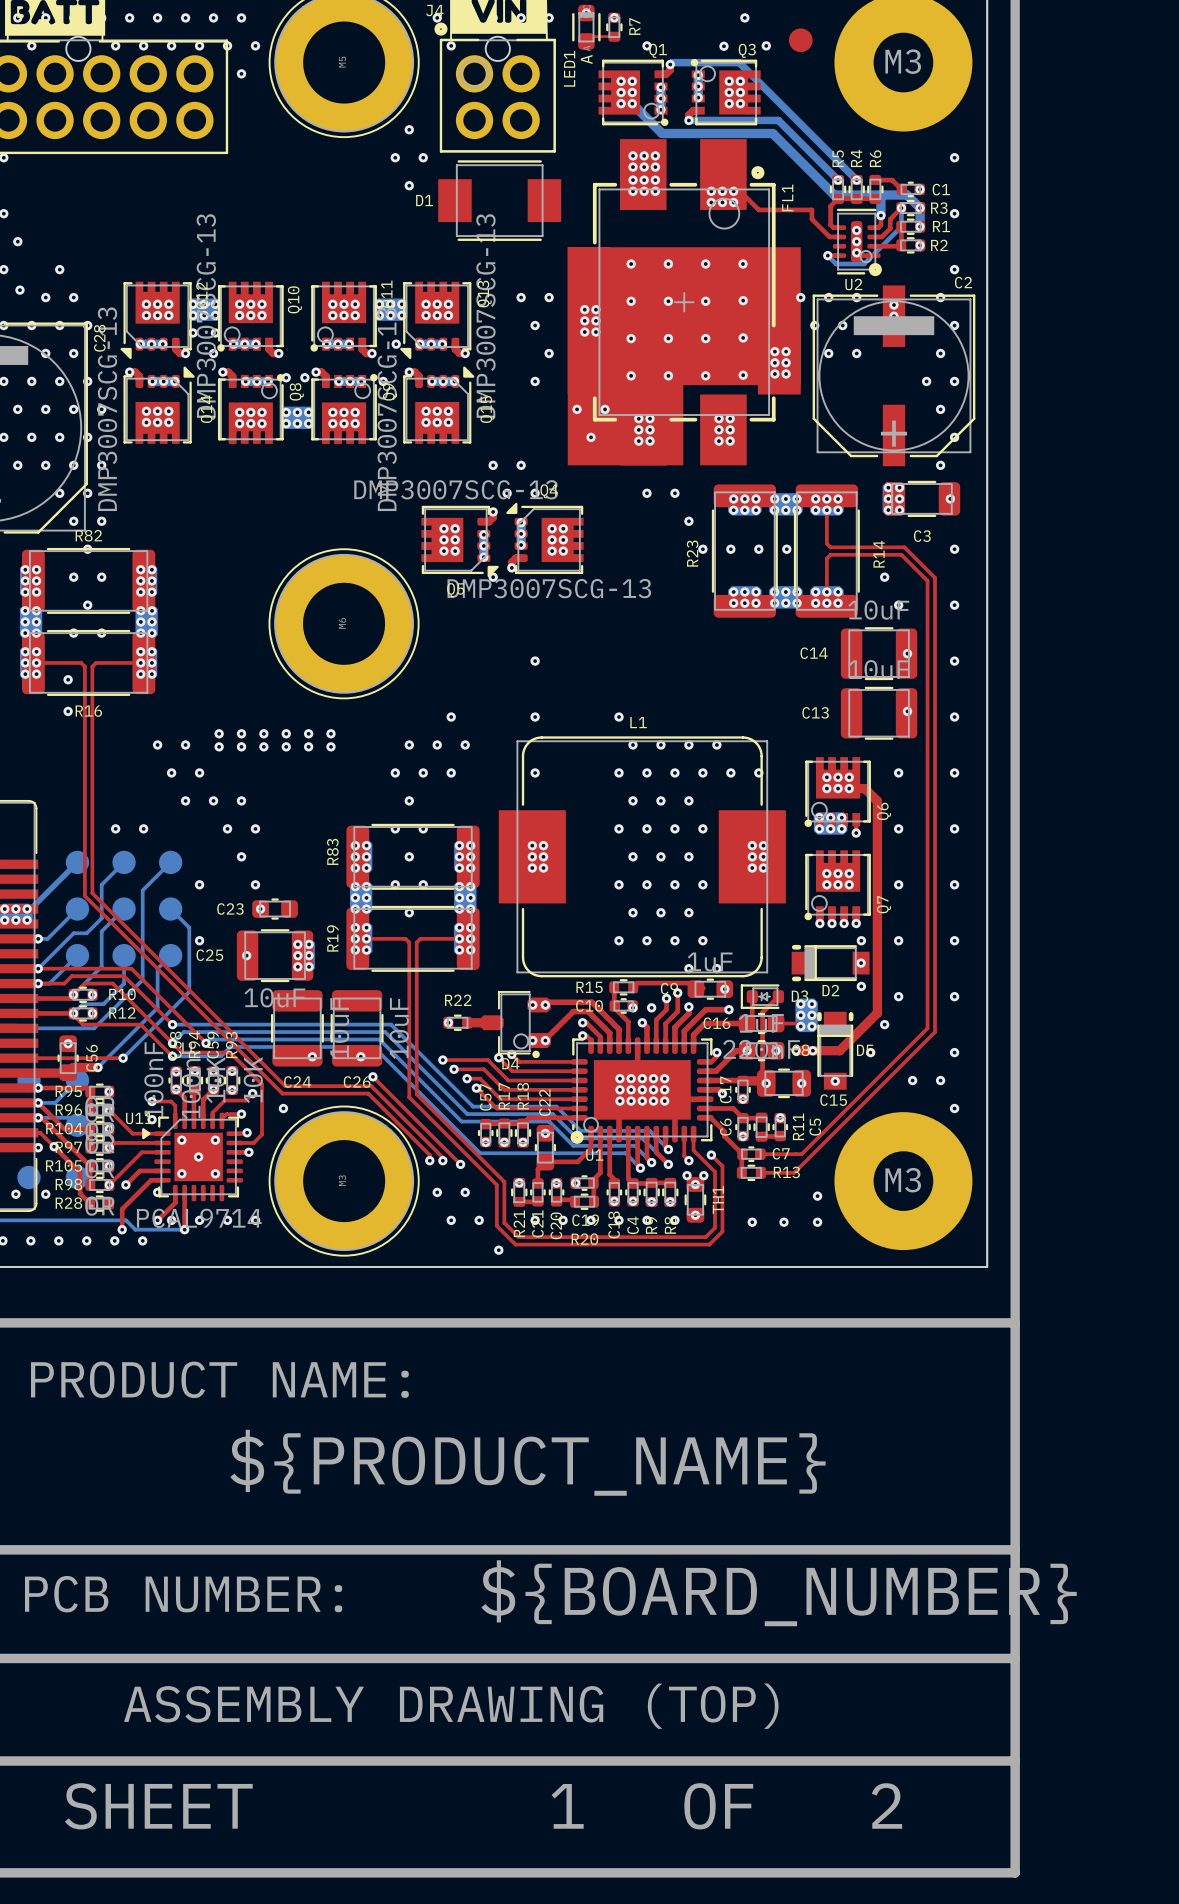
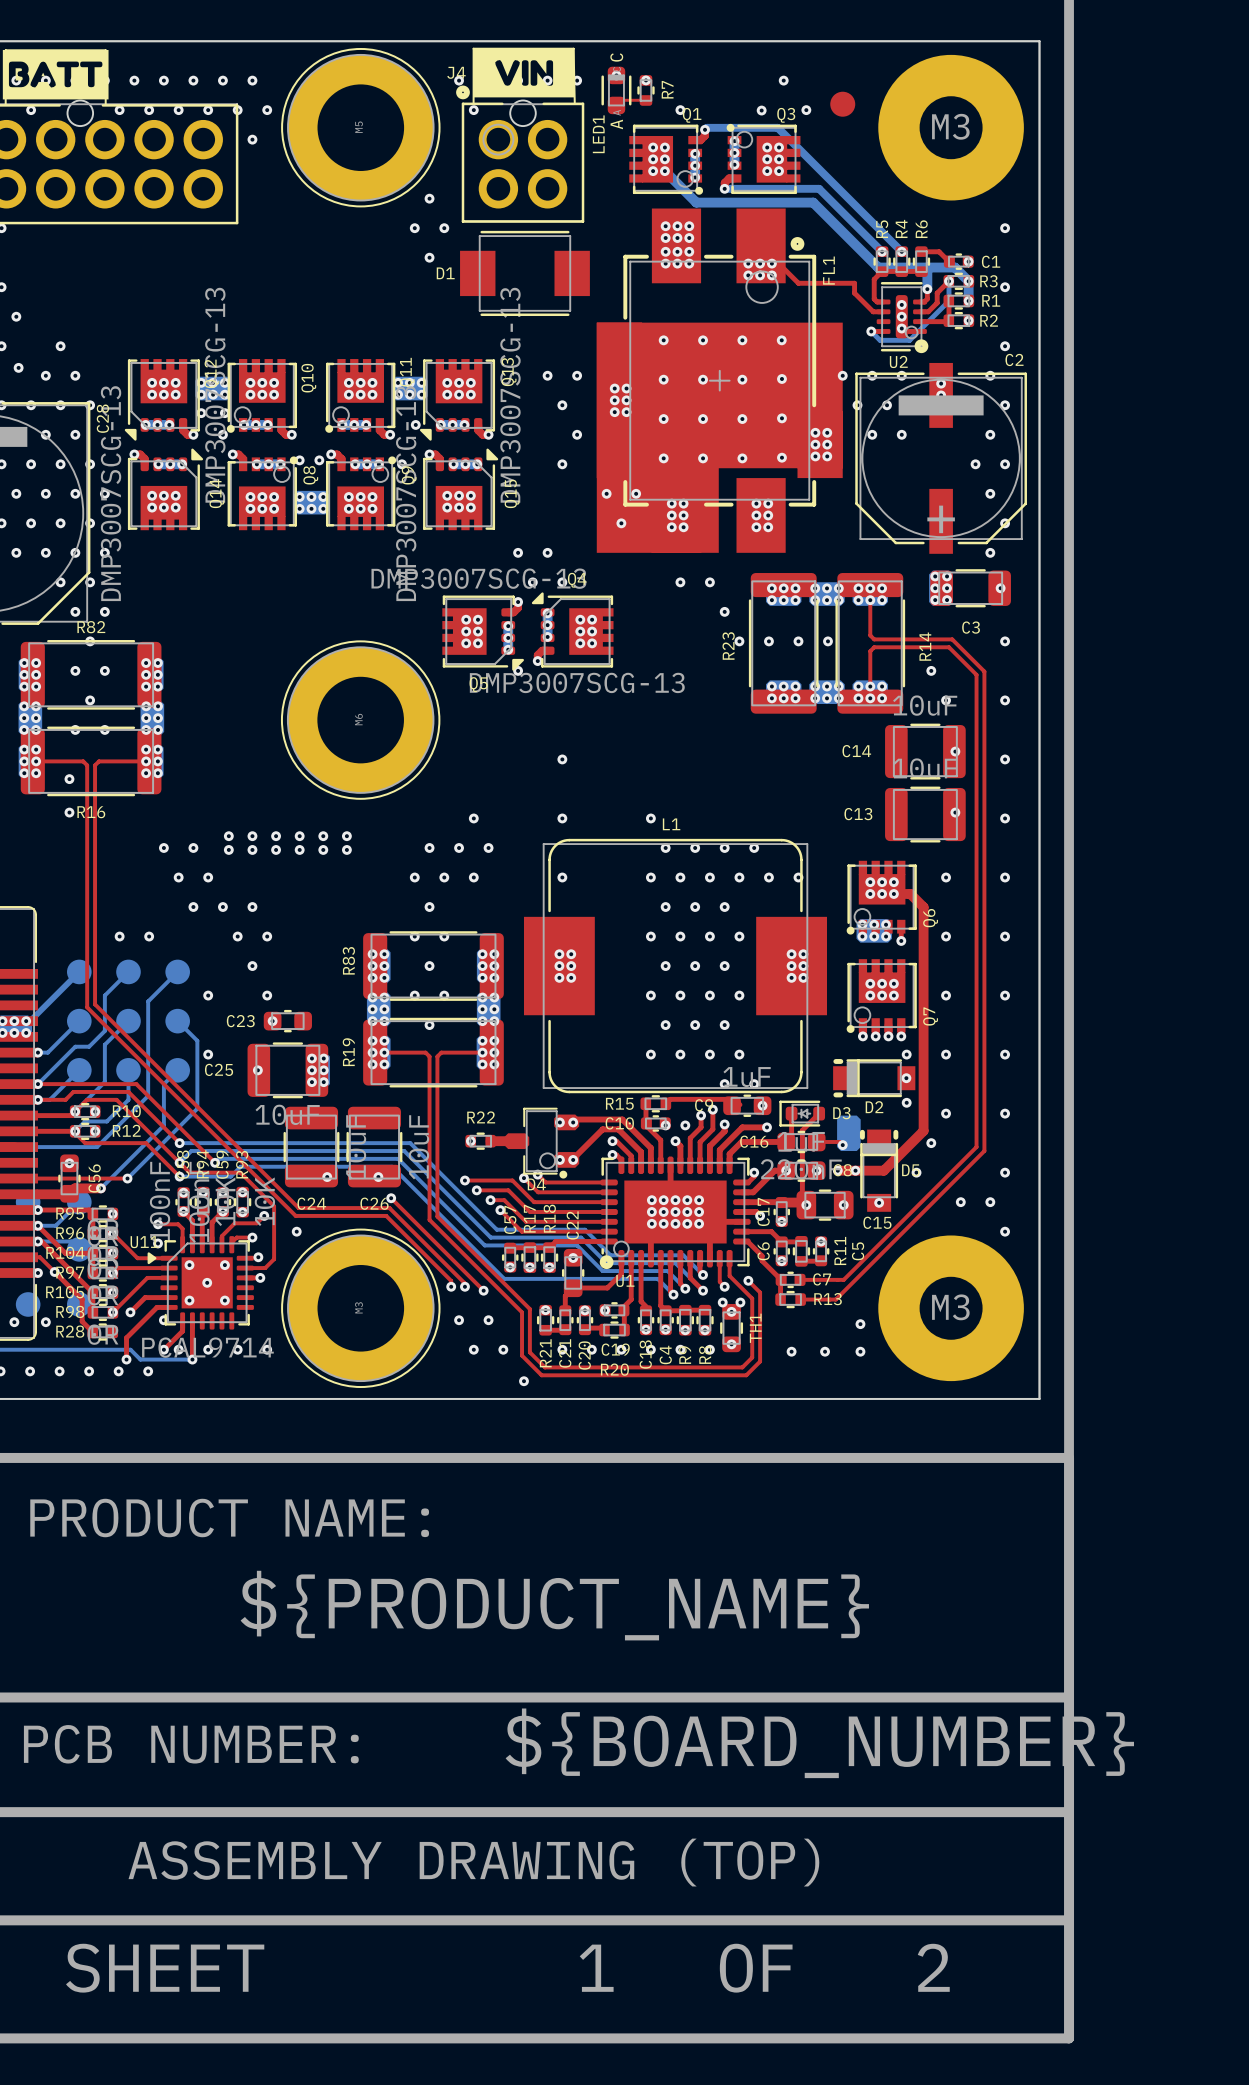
via: (800, 1004) -> none
via: (811, 1004) -> none
via: (800, 1015) -> none
via: (811, 1015) -> none
via: (811, 1026) -> none

